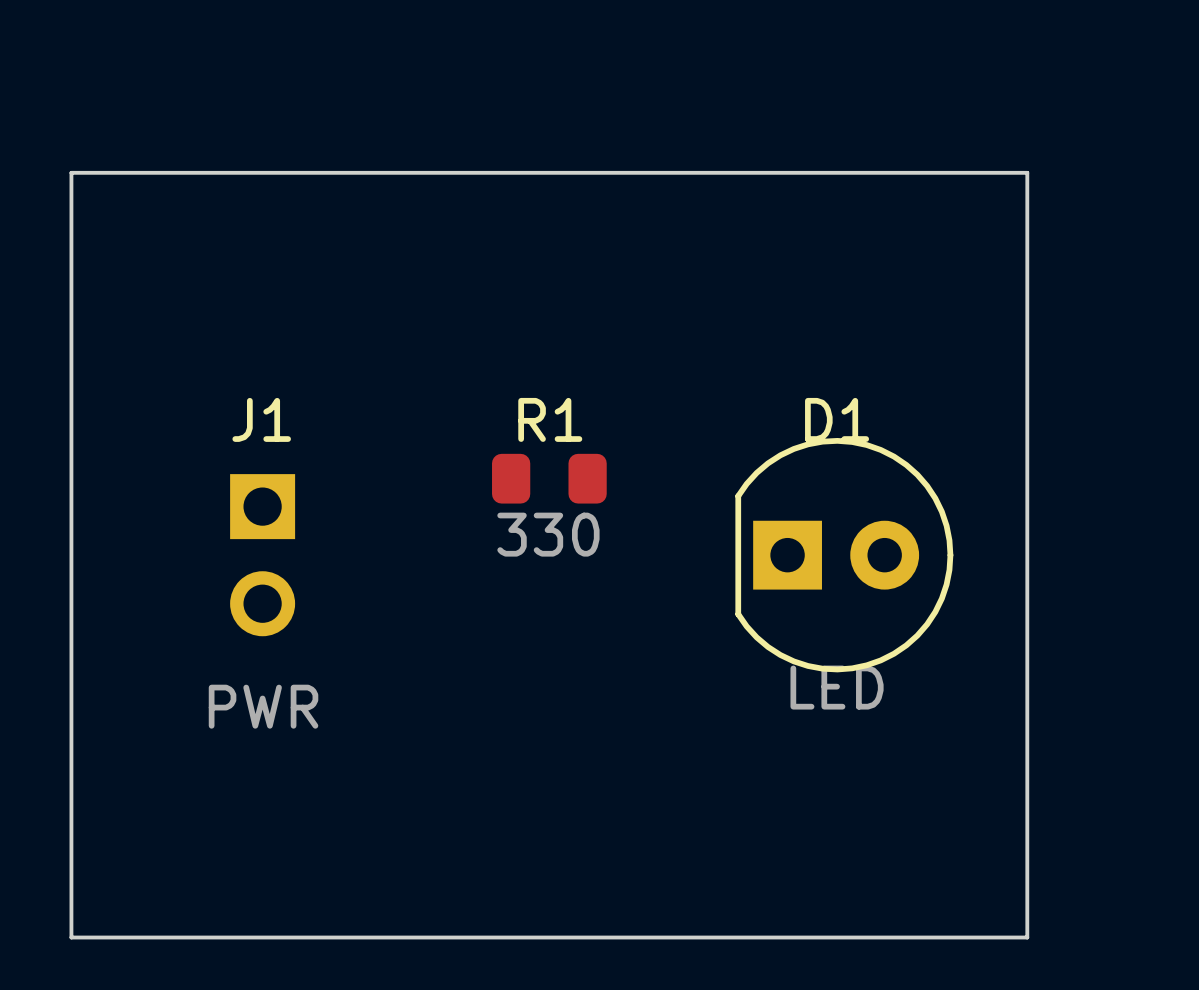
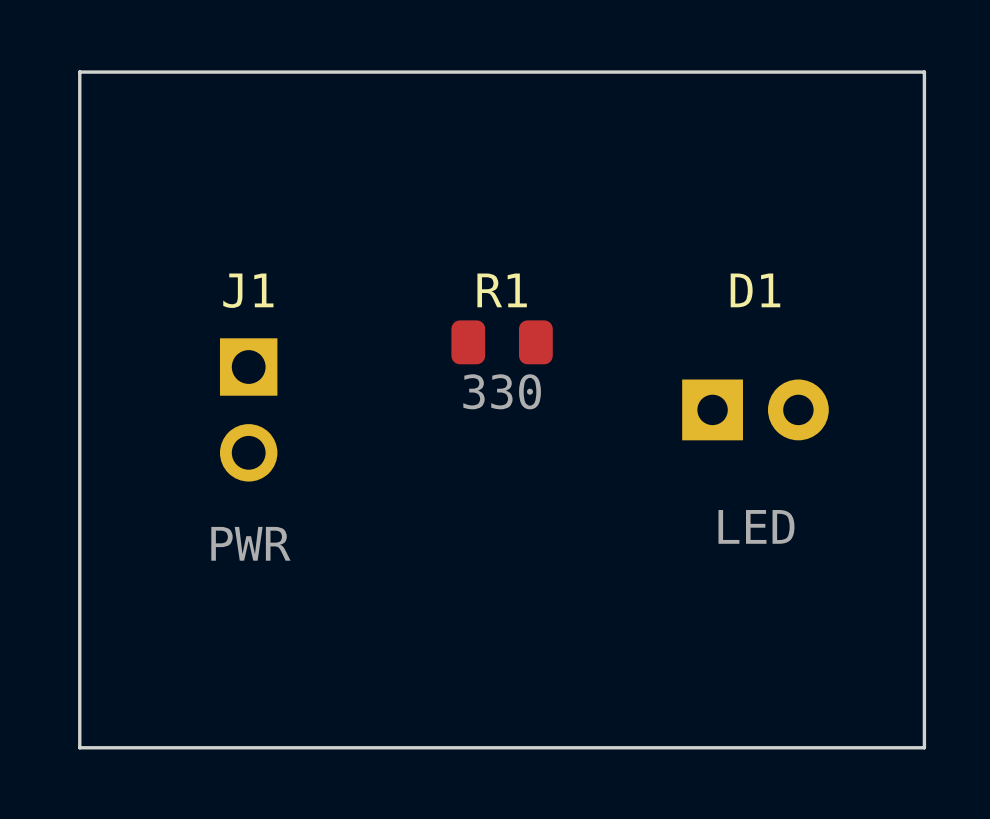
D1 footprint: [735, 437, 954, 673] -> [682, 379, 829, 441]

